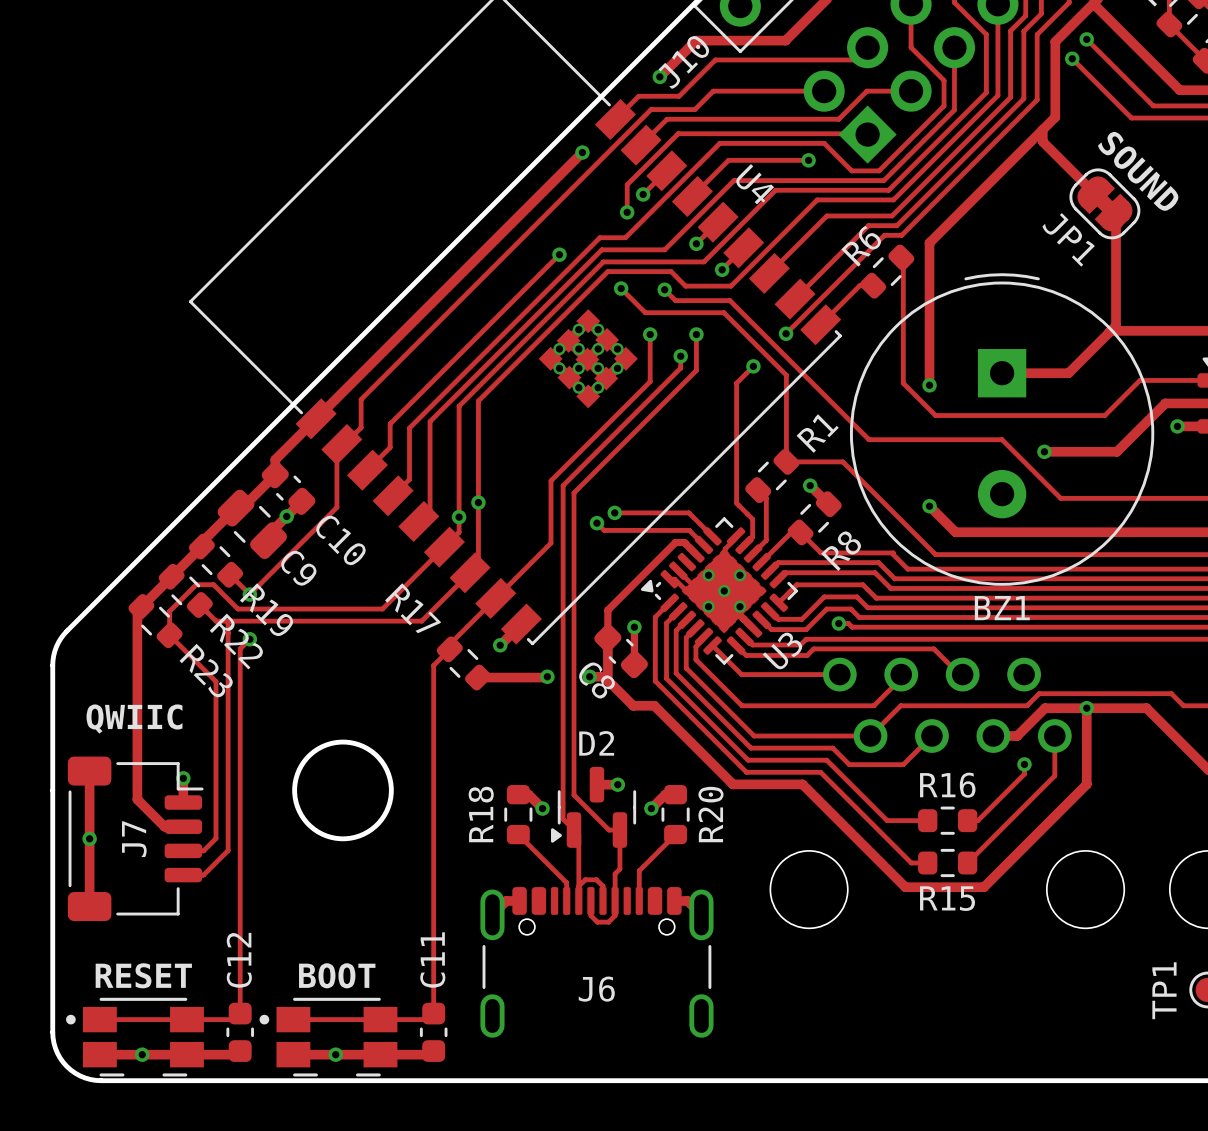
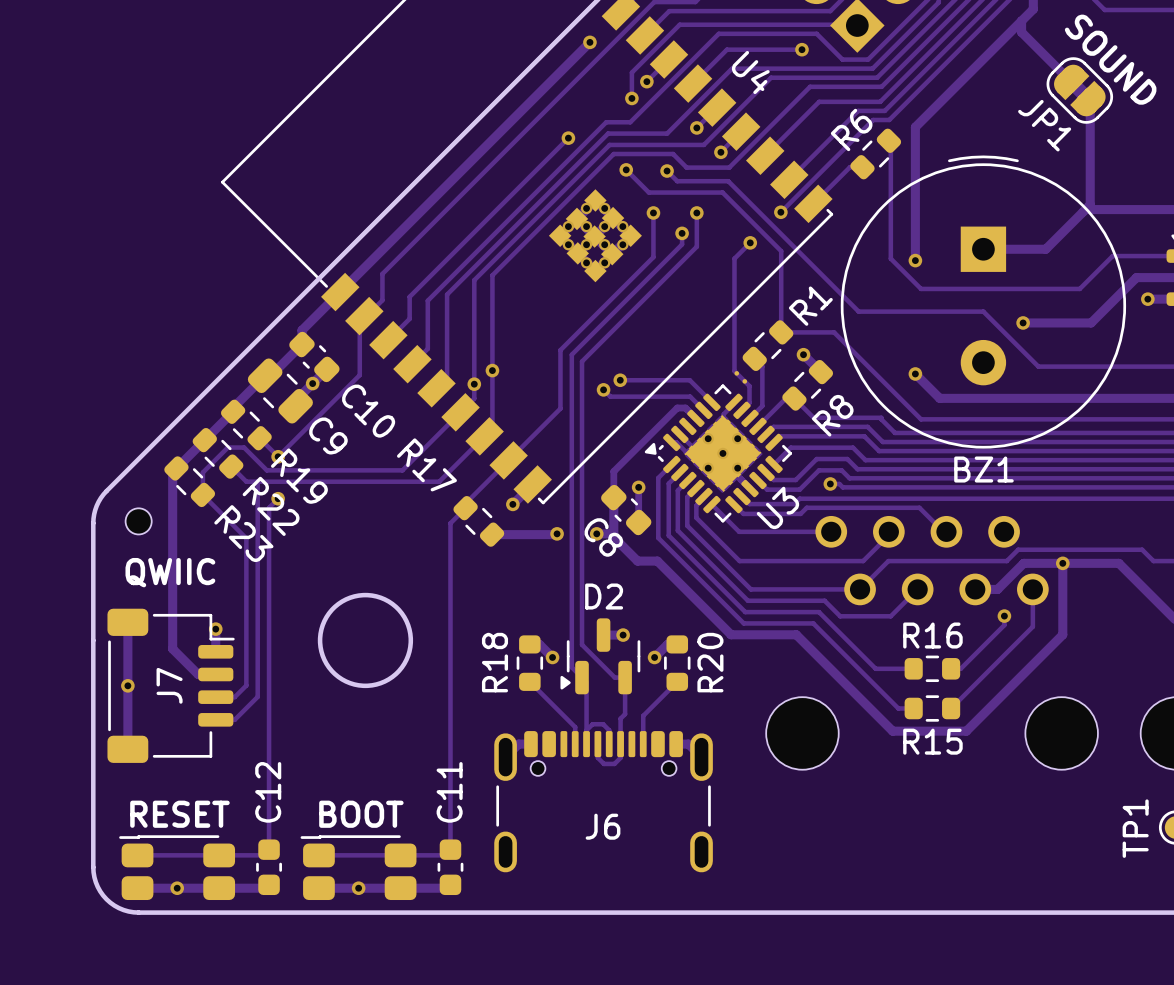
part: none -> (138, 521)
part footprint: [66, 997, 204, 1077] -> [119, 835, 236, 901]
part footprint: [259, 997, 398, 1077] -> [300, 835, 417, 901]

